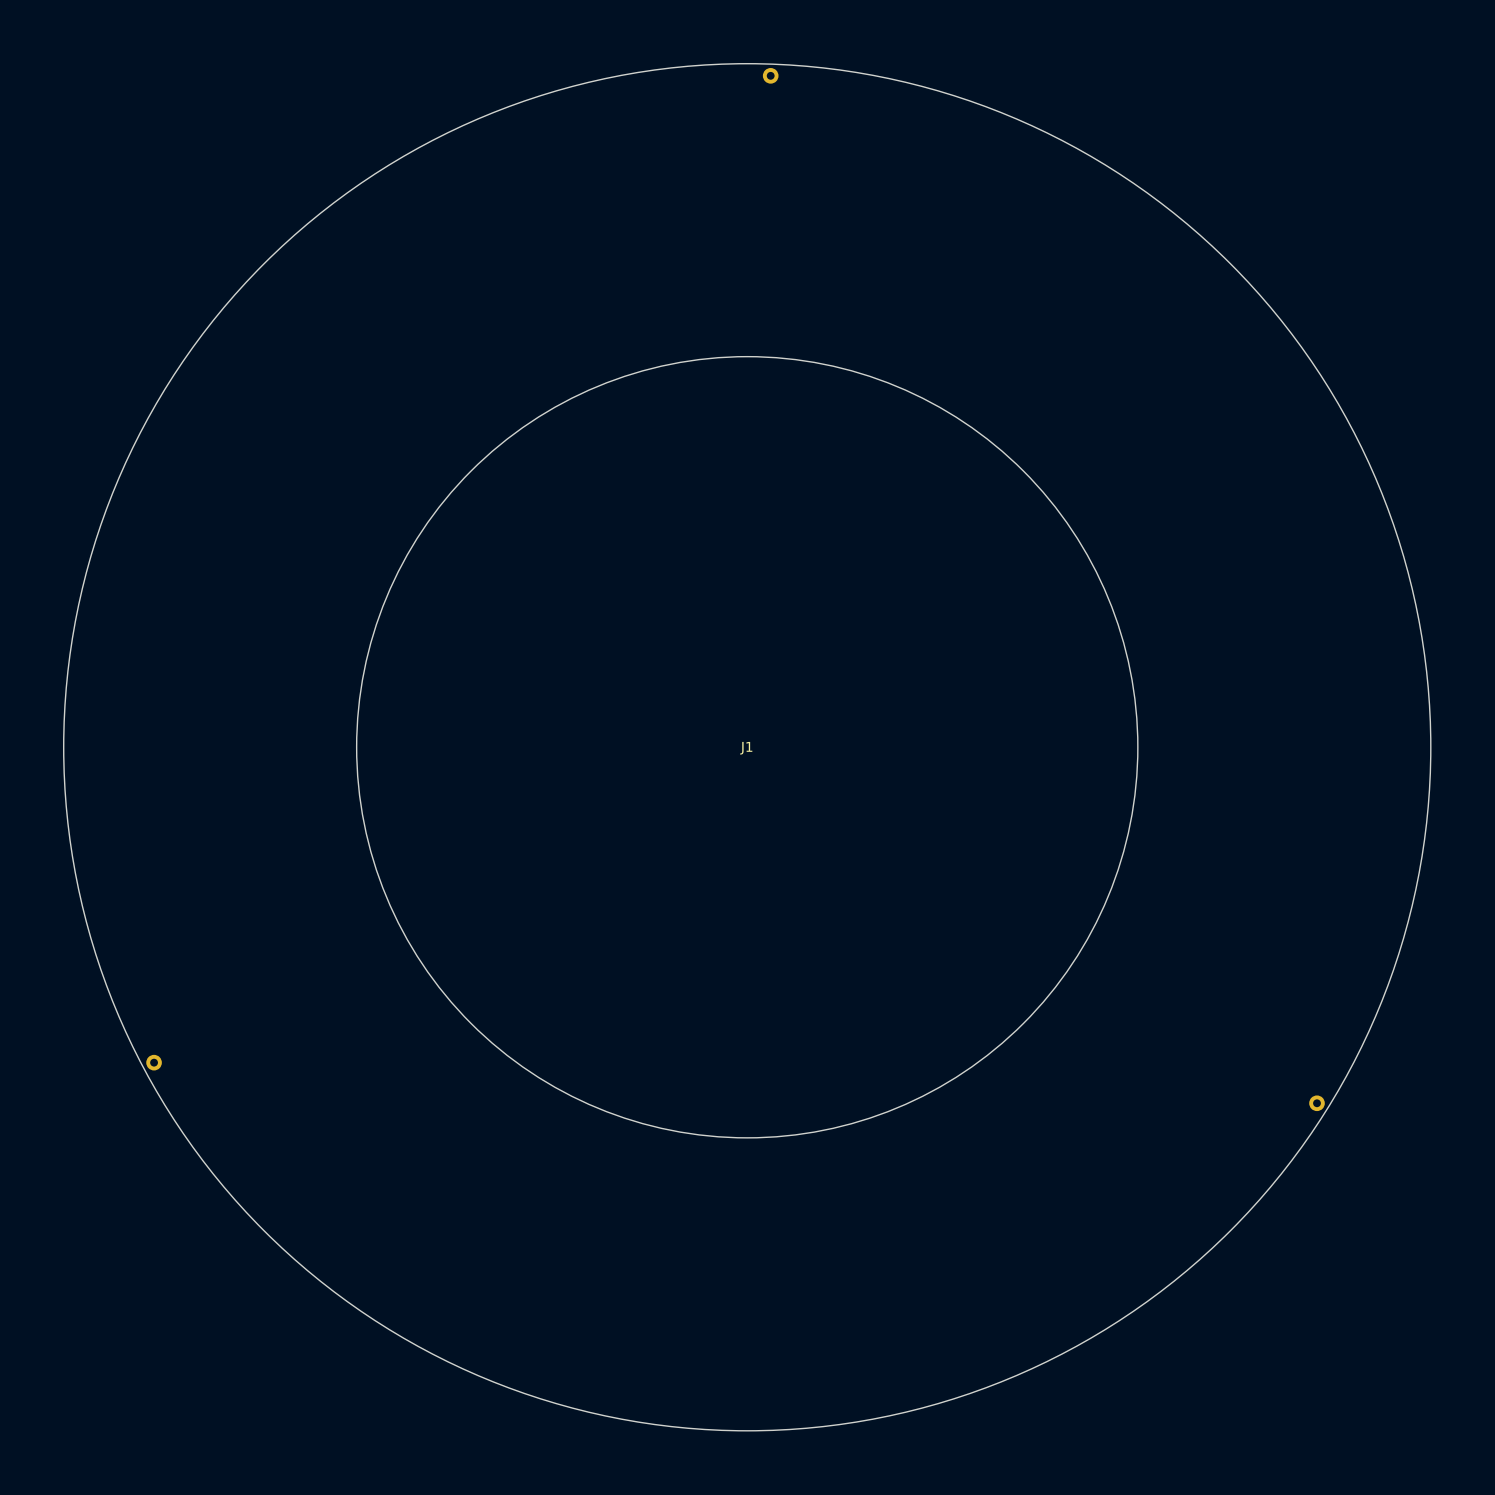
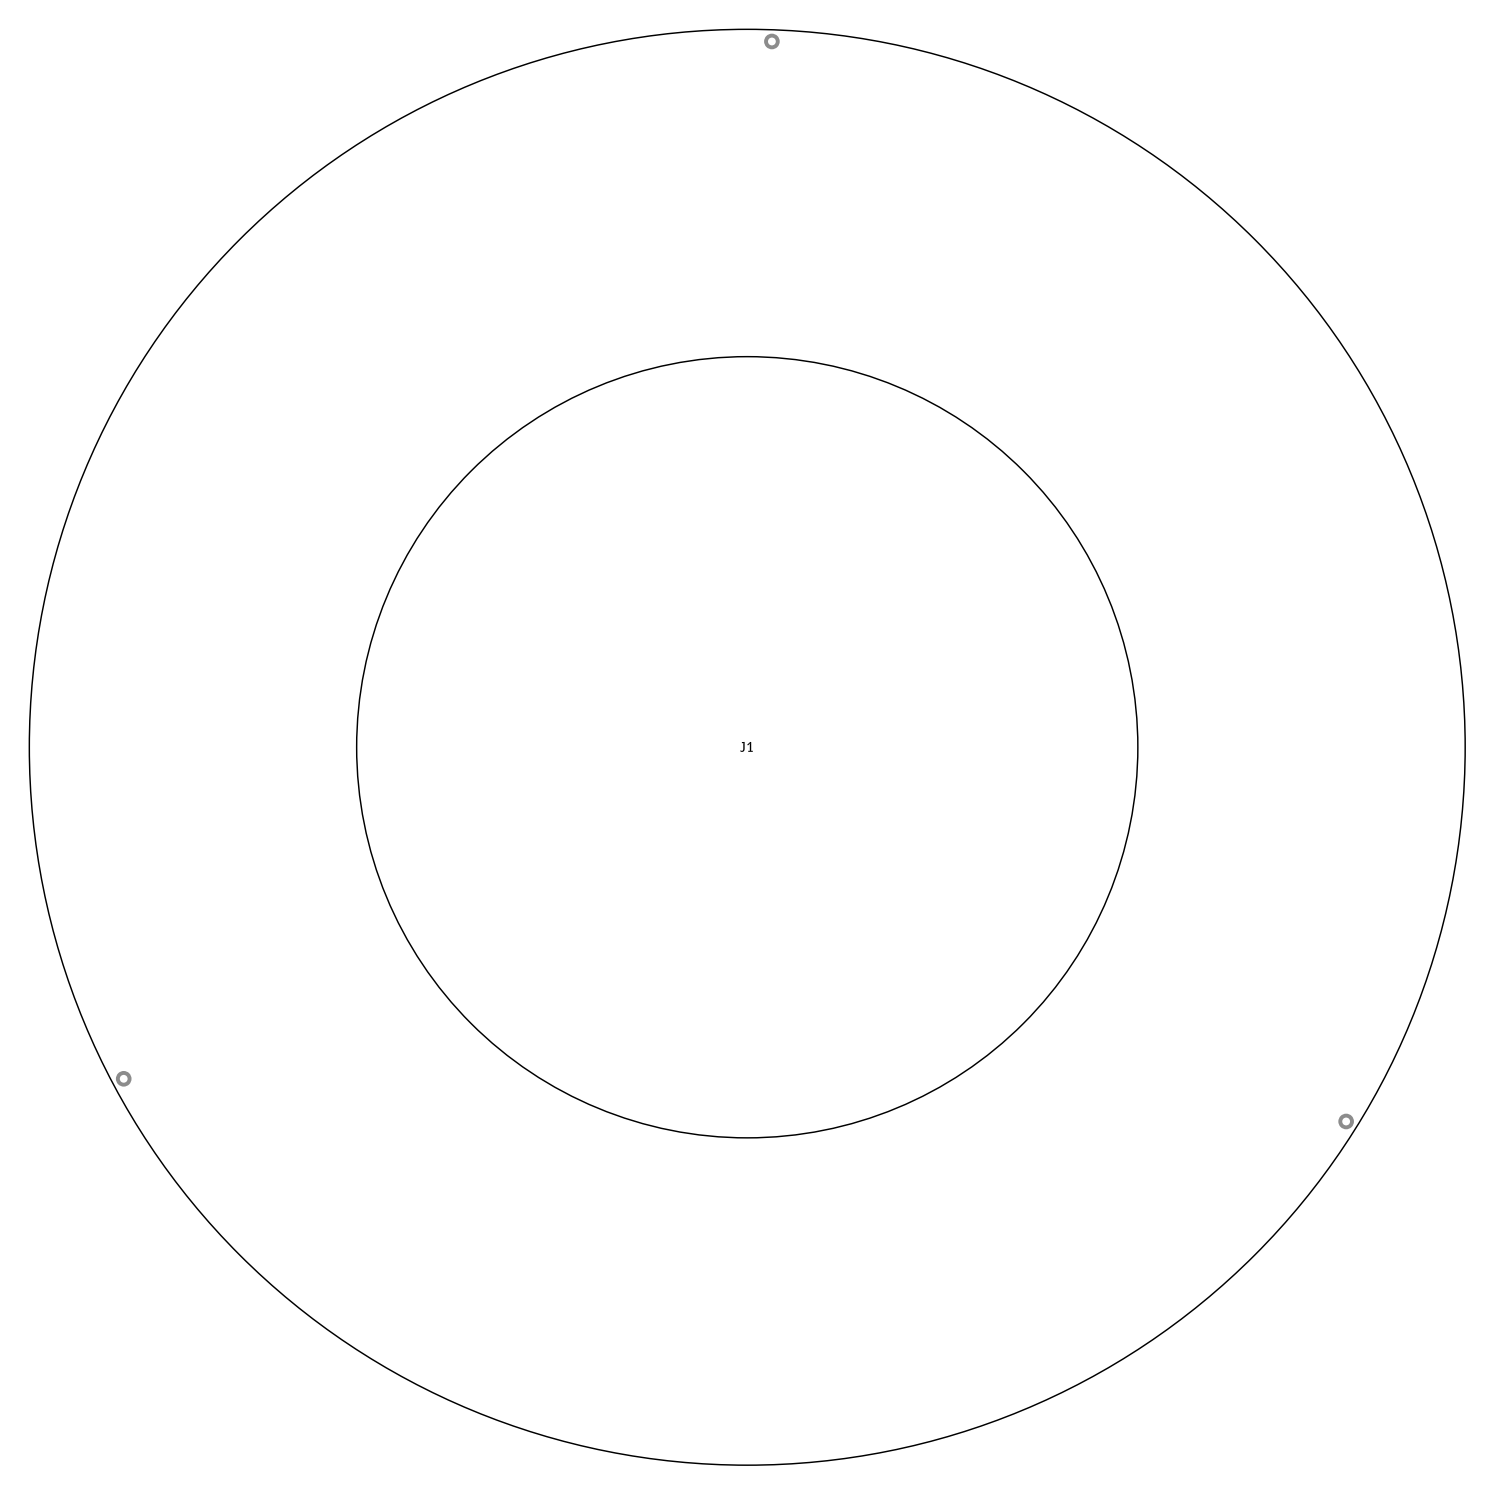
round board edge size: [63, 63, 1432, 1432] -> [28, 28, 1466, 1466]
J1 footprint: [146, 68, 1325, 1112] -> [115, 33, 1354, 1130]

